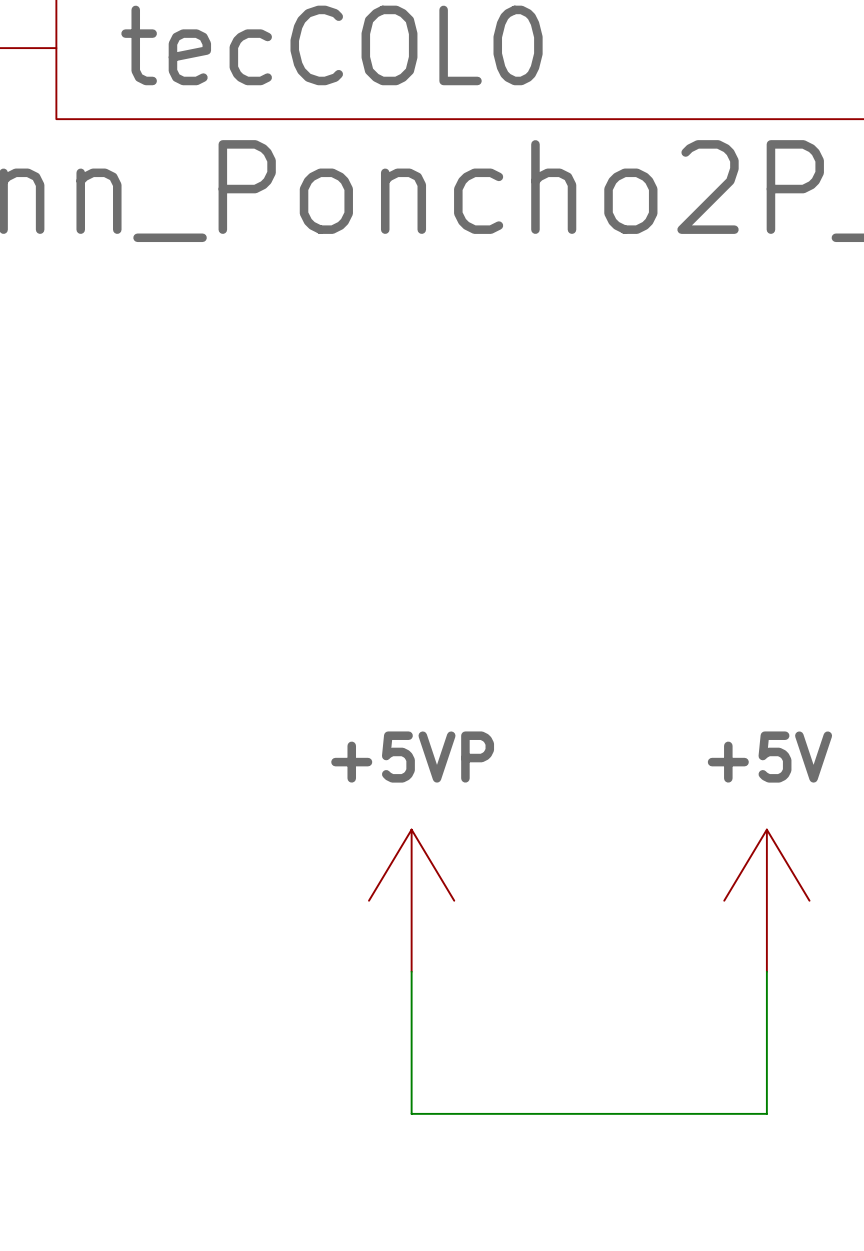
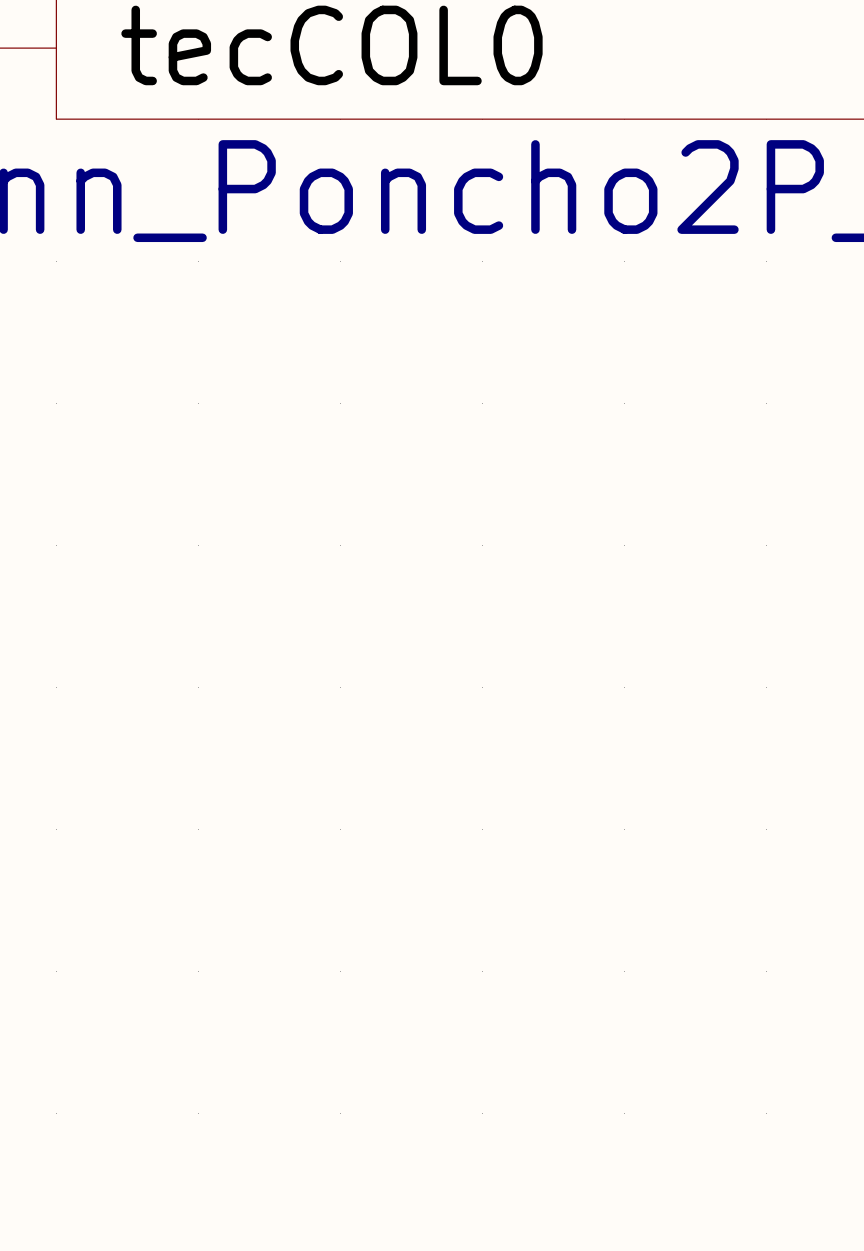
power symbol: +5VP (411, 900) -> none
power symbol: +5V (766, 900) -> none
wire: (411, 971) (411, 1113) (766, 1113) (766, 971) -> none

